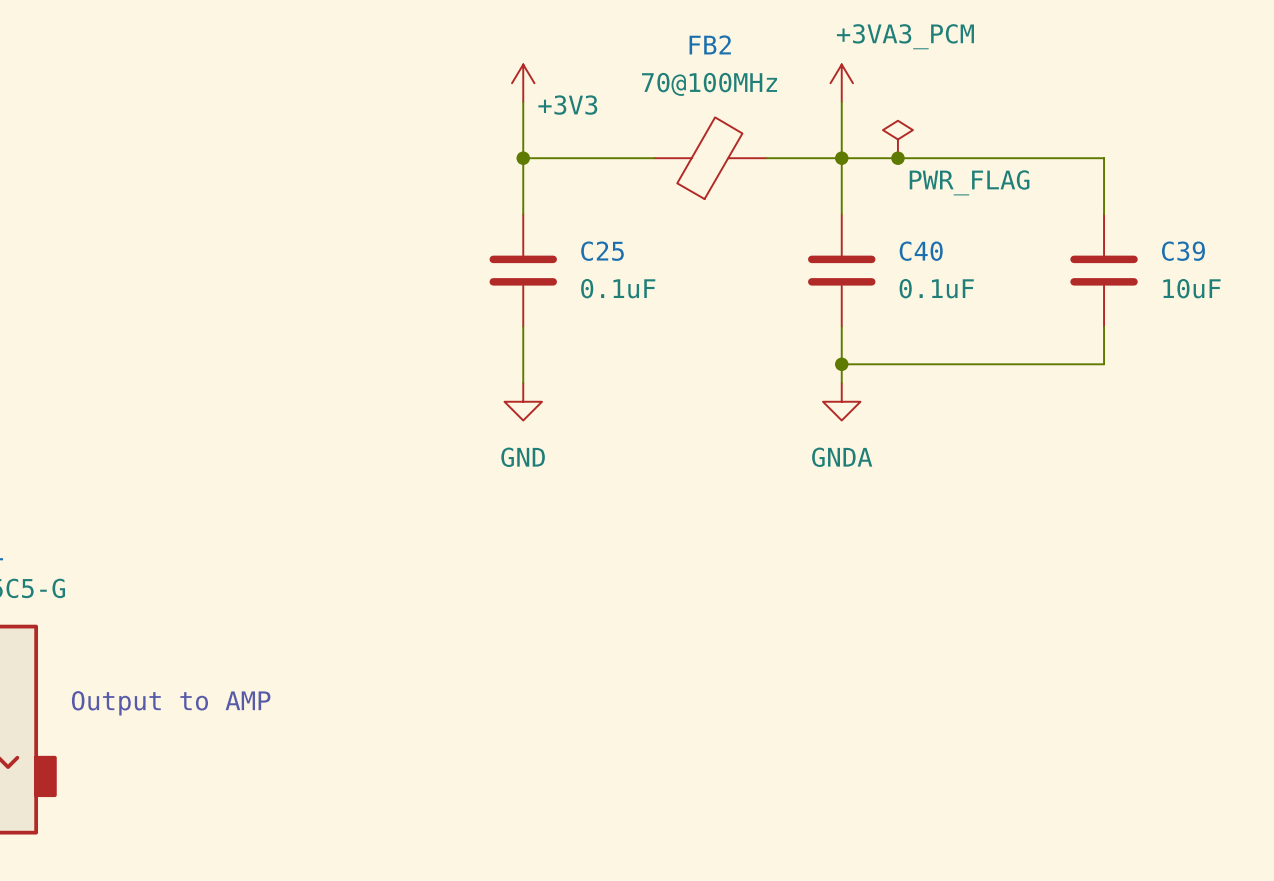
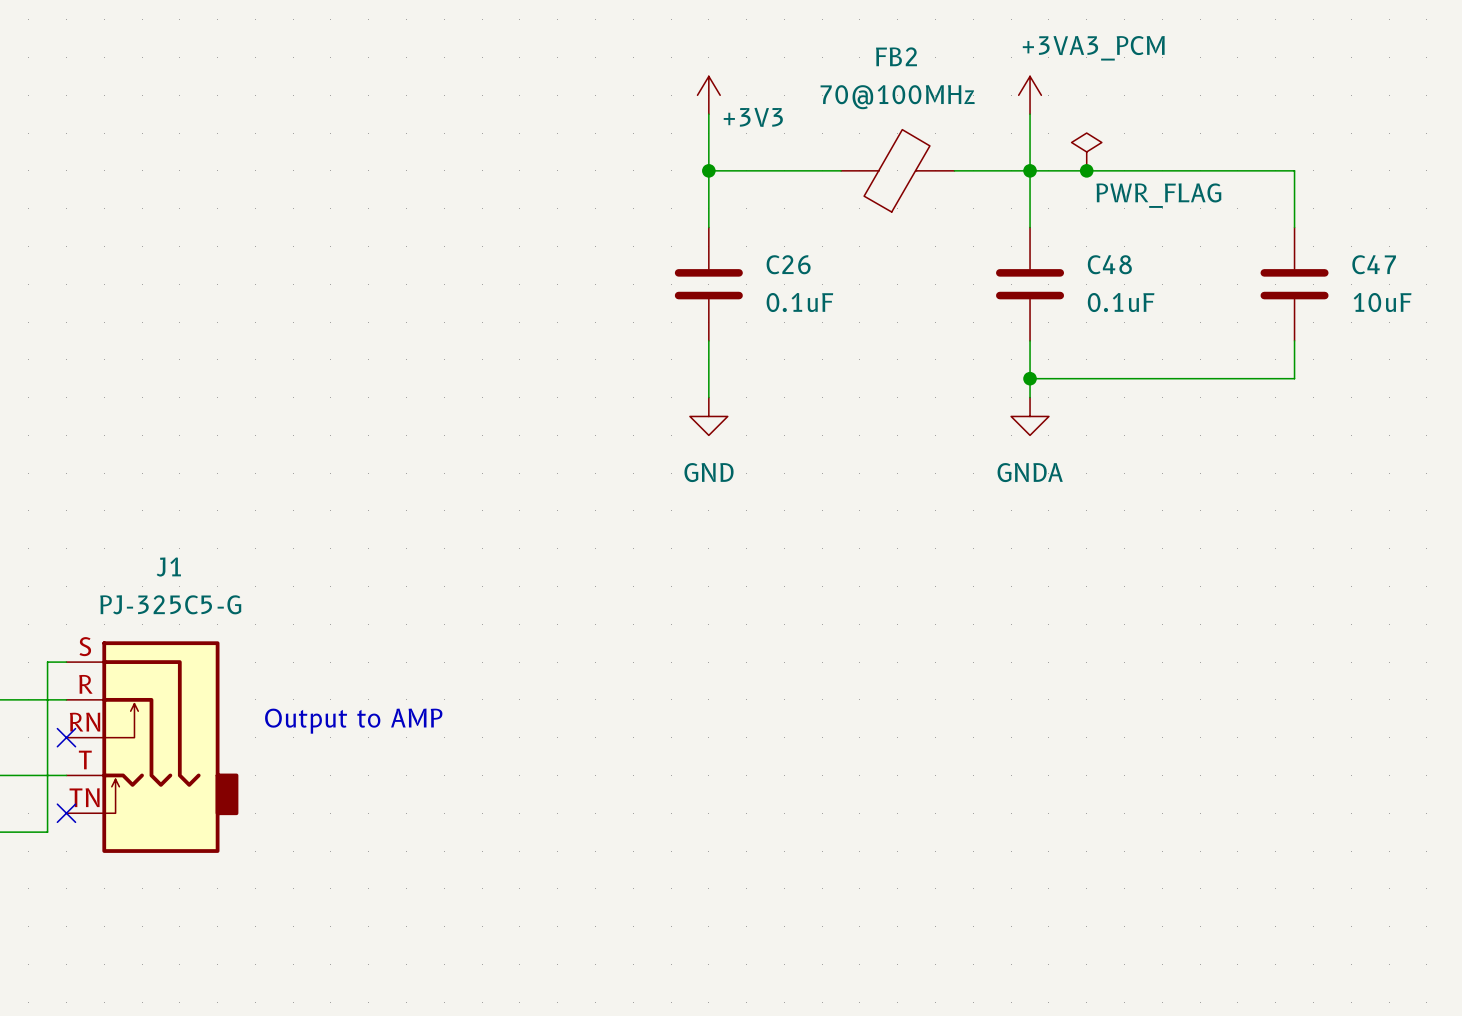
C25 name: C25 (602, 251) -> C26 (788, 264)
C40 name: C40 (921, 251) -> C48 (1109, 264)
C39 name: C39 (1183, 251) -> C47 (1374, 264)

